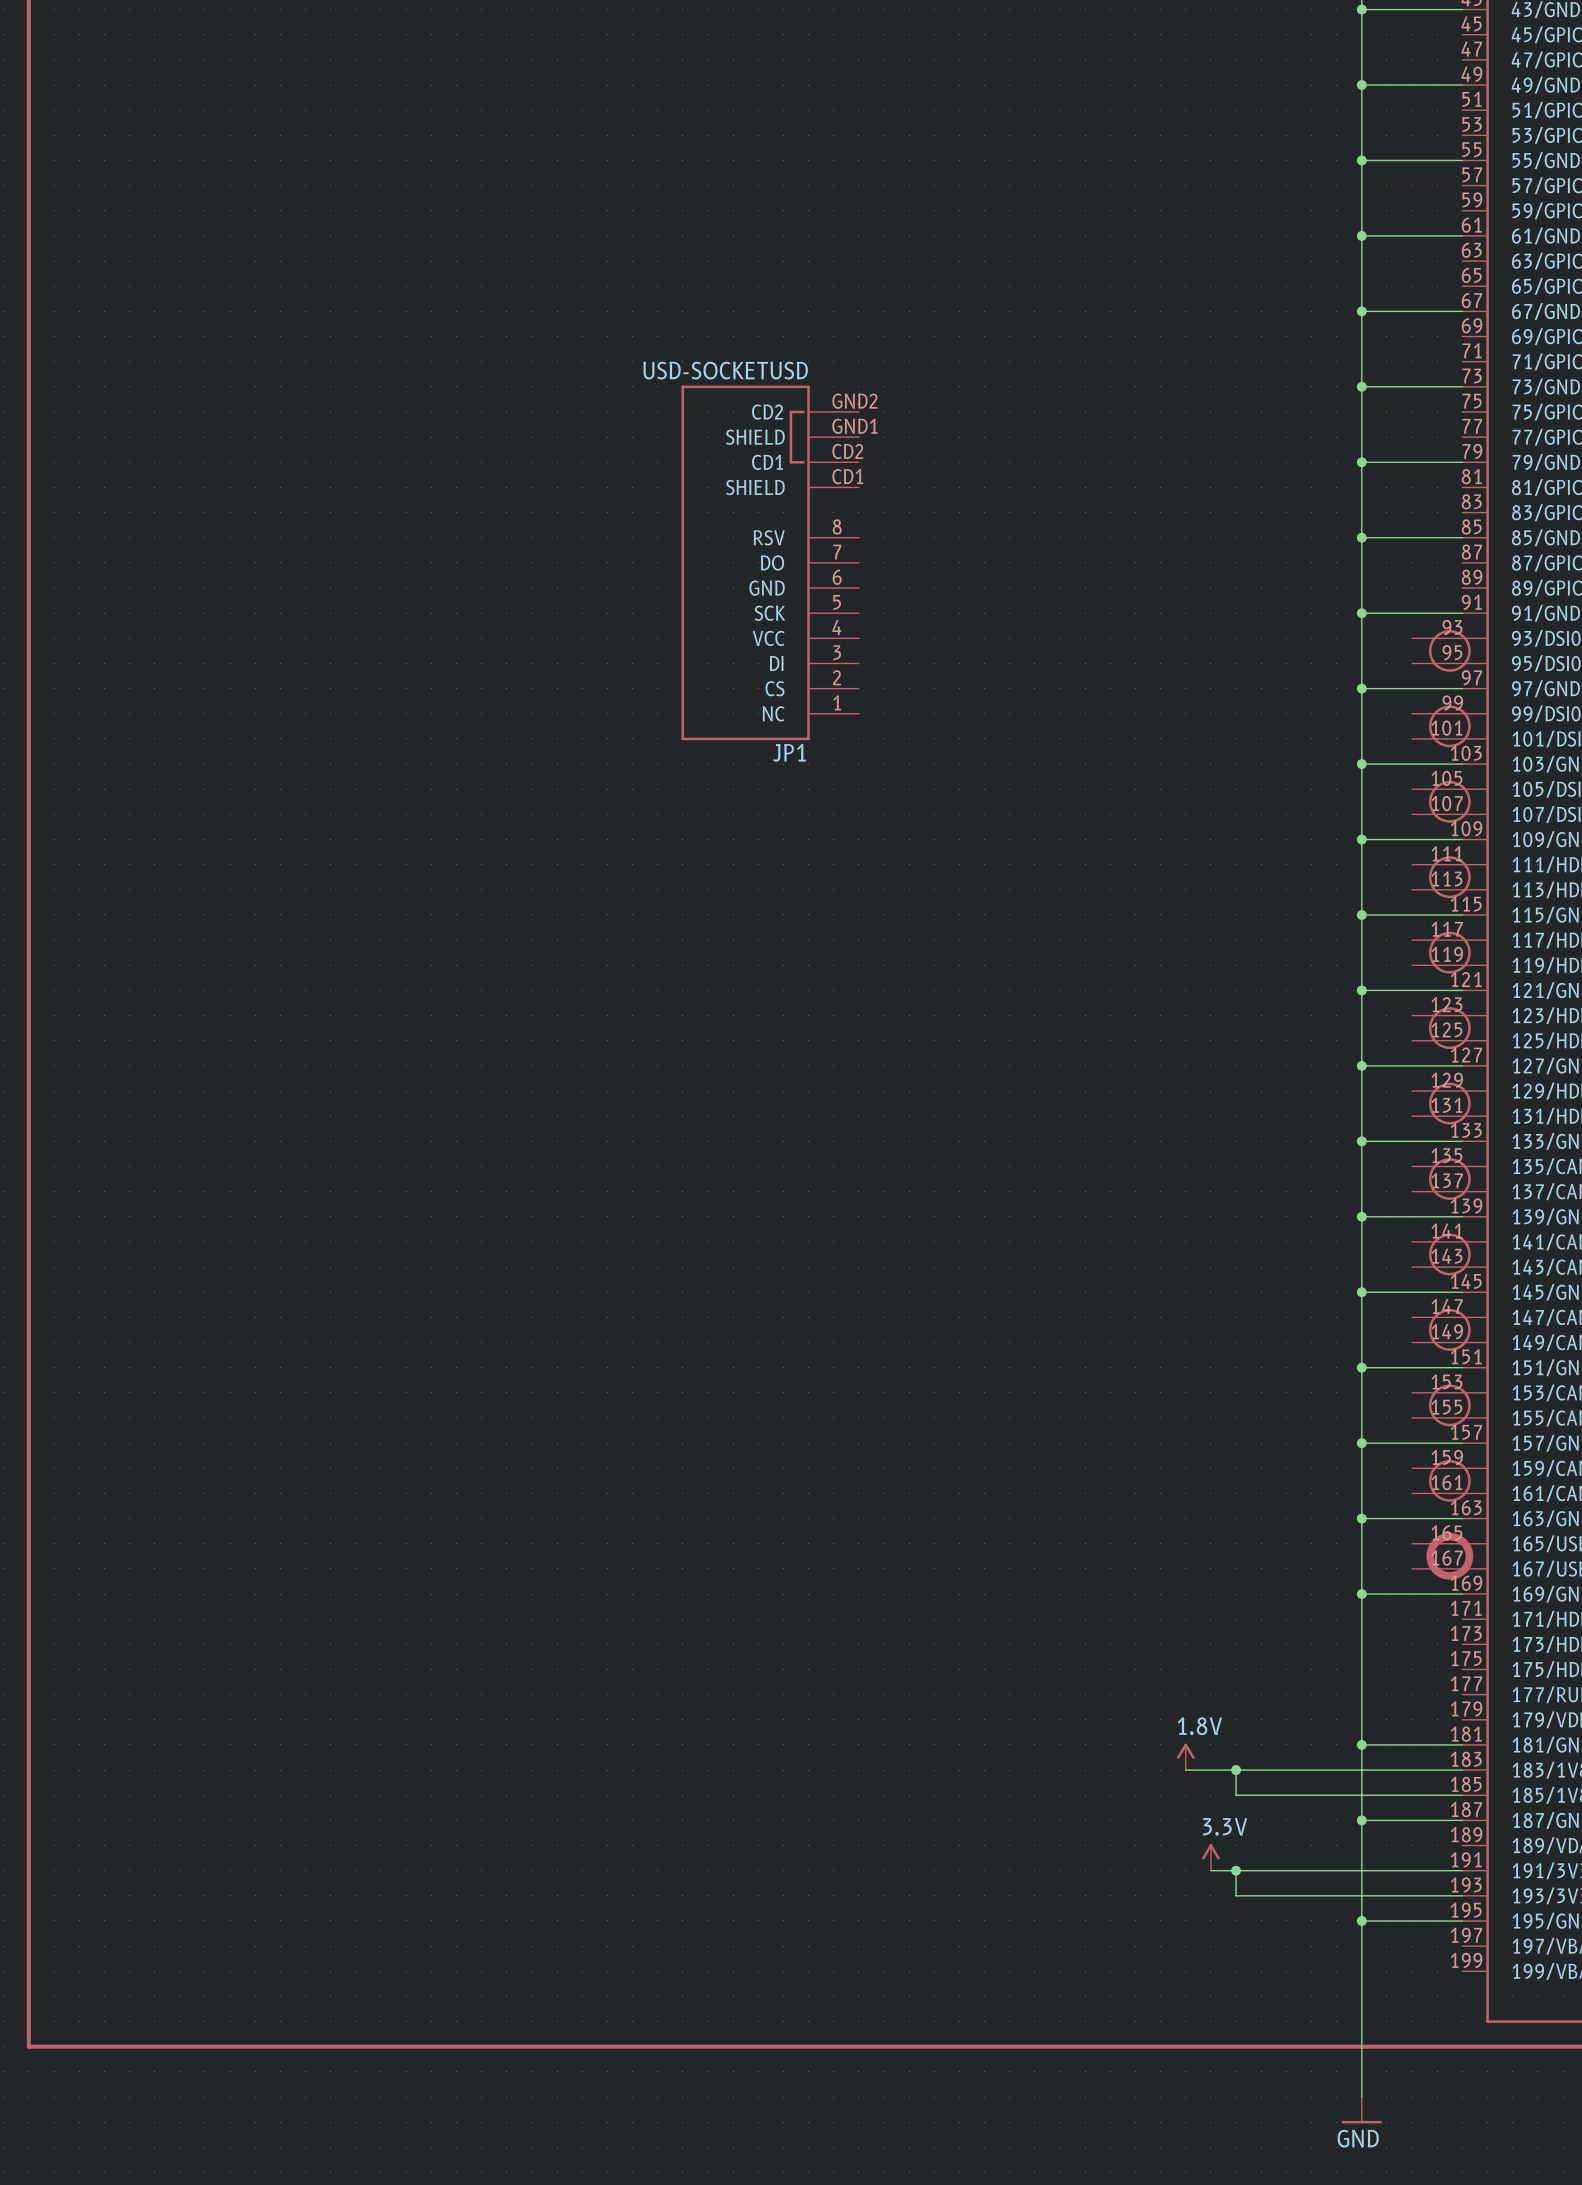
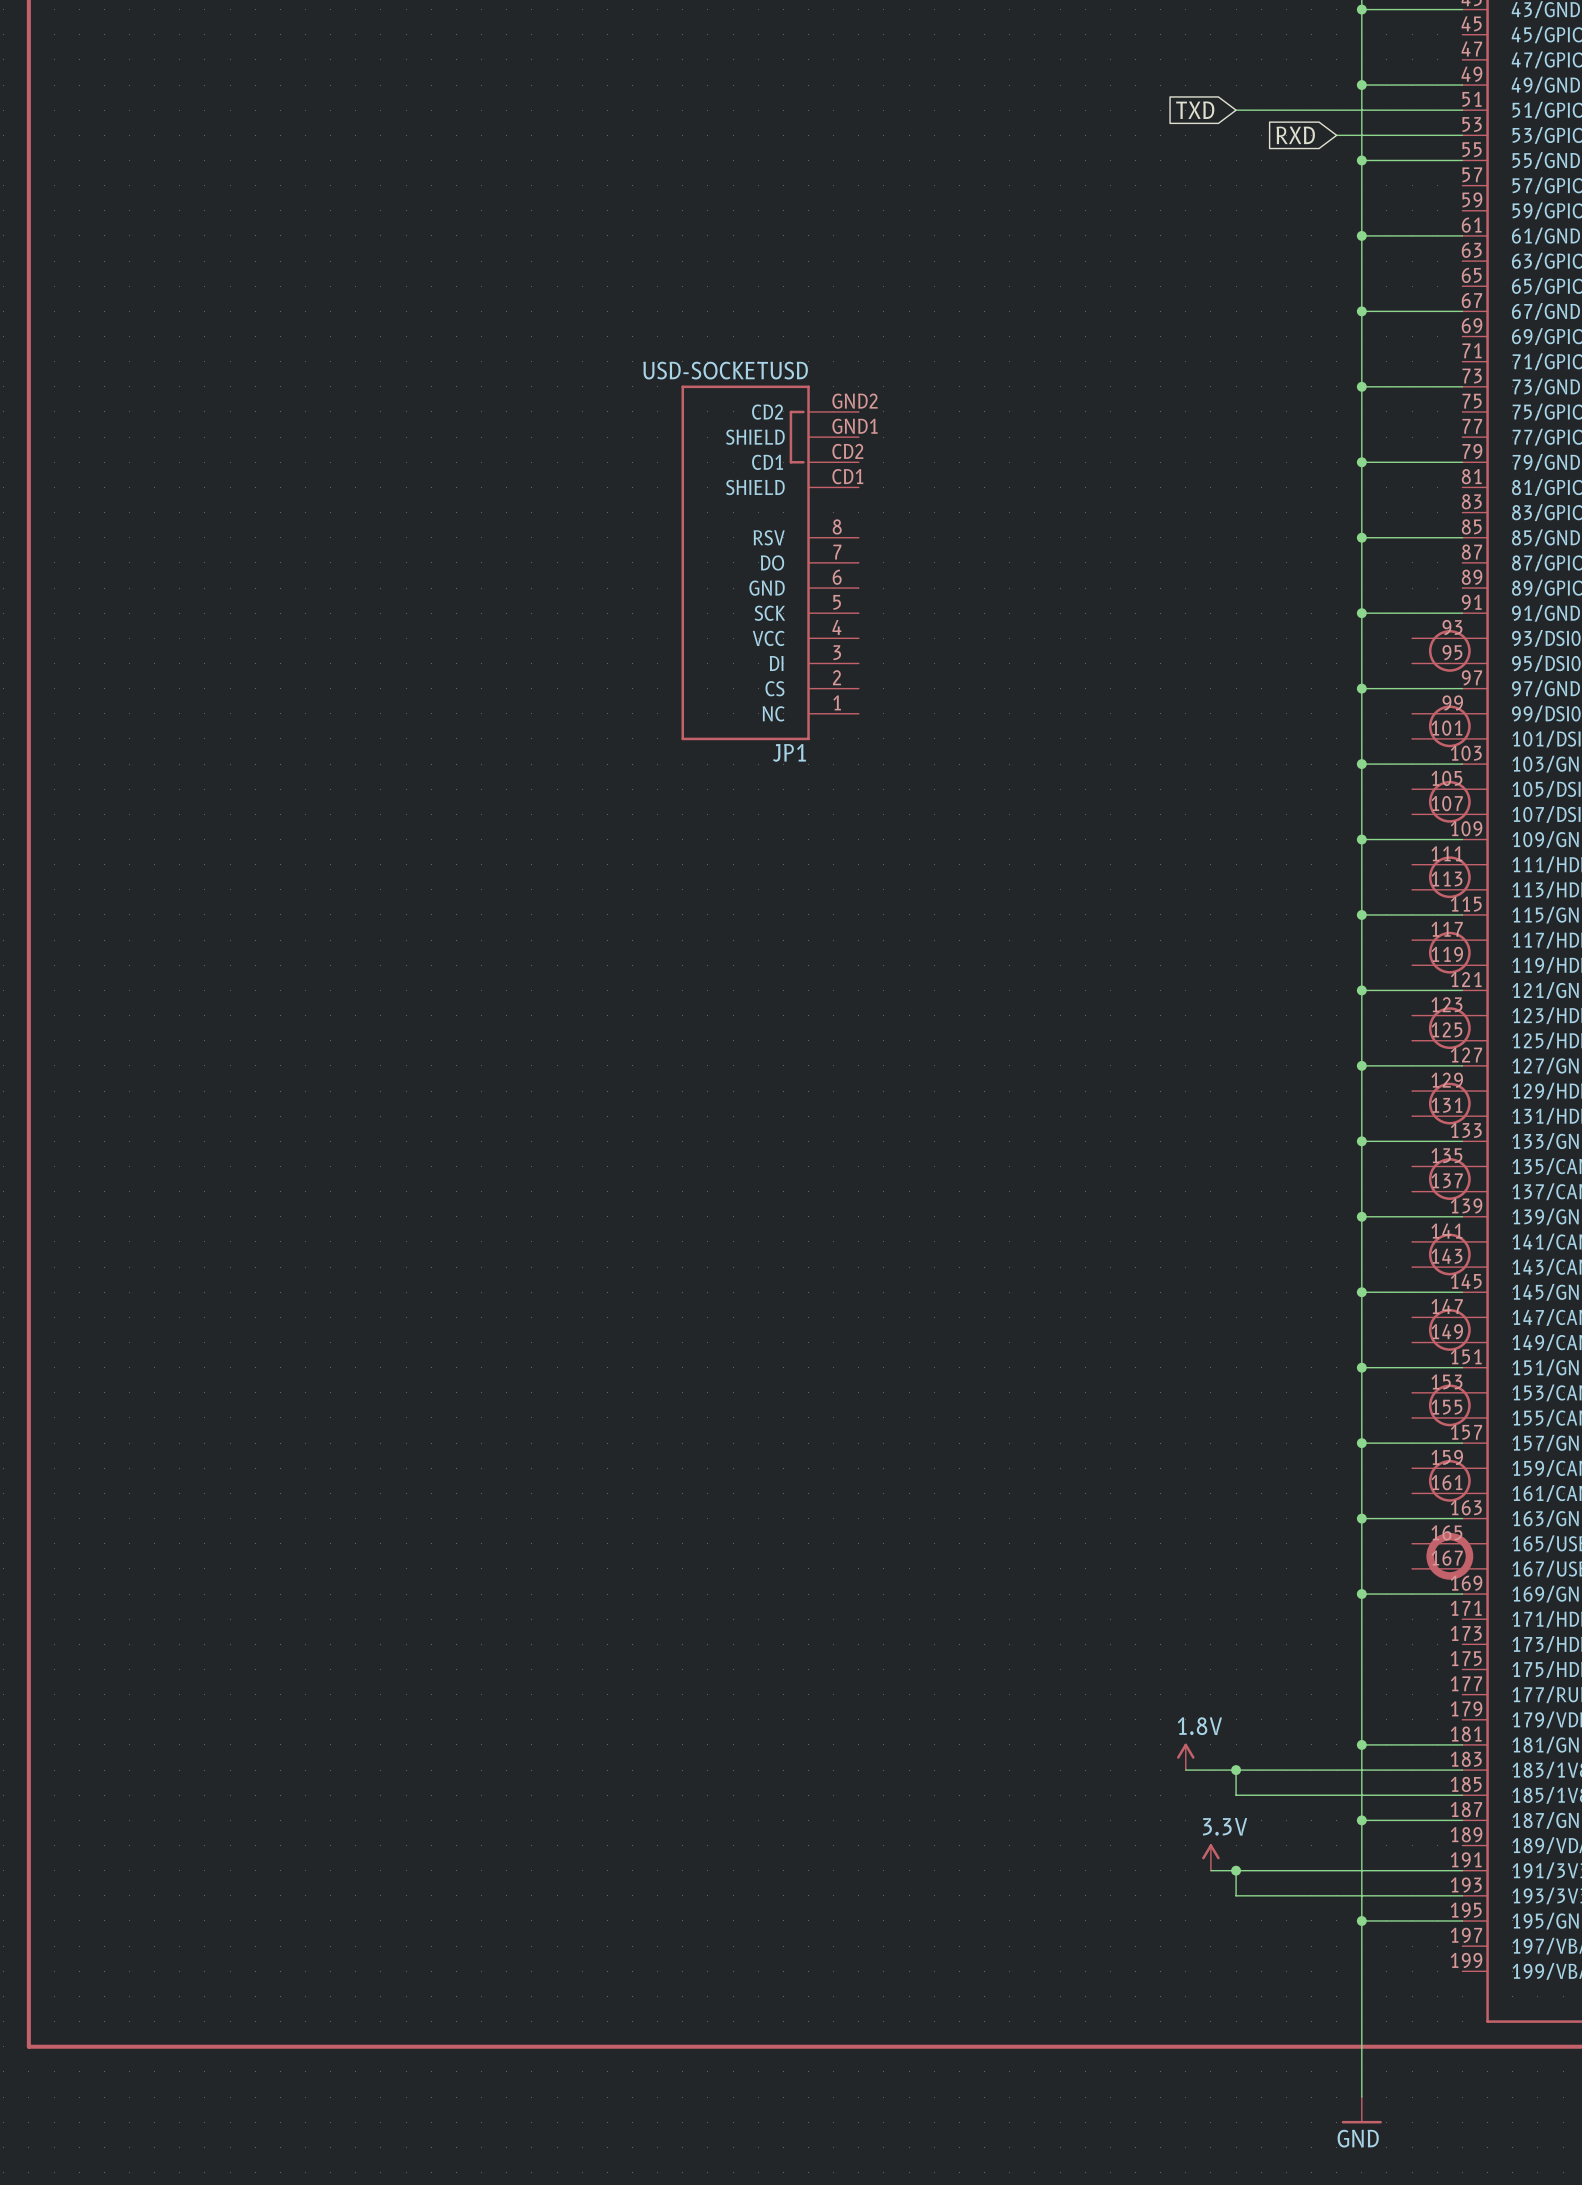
global label: none -> TXD (1195, 110)
wire: none -> (1236, 110) (1462, 110)
global label: none -> RXD (1295, 135)
wire: none -> (1336, 135) (1462, 135)

